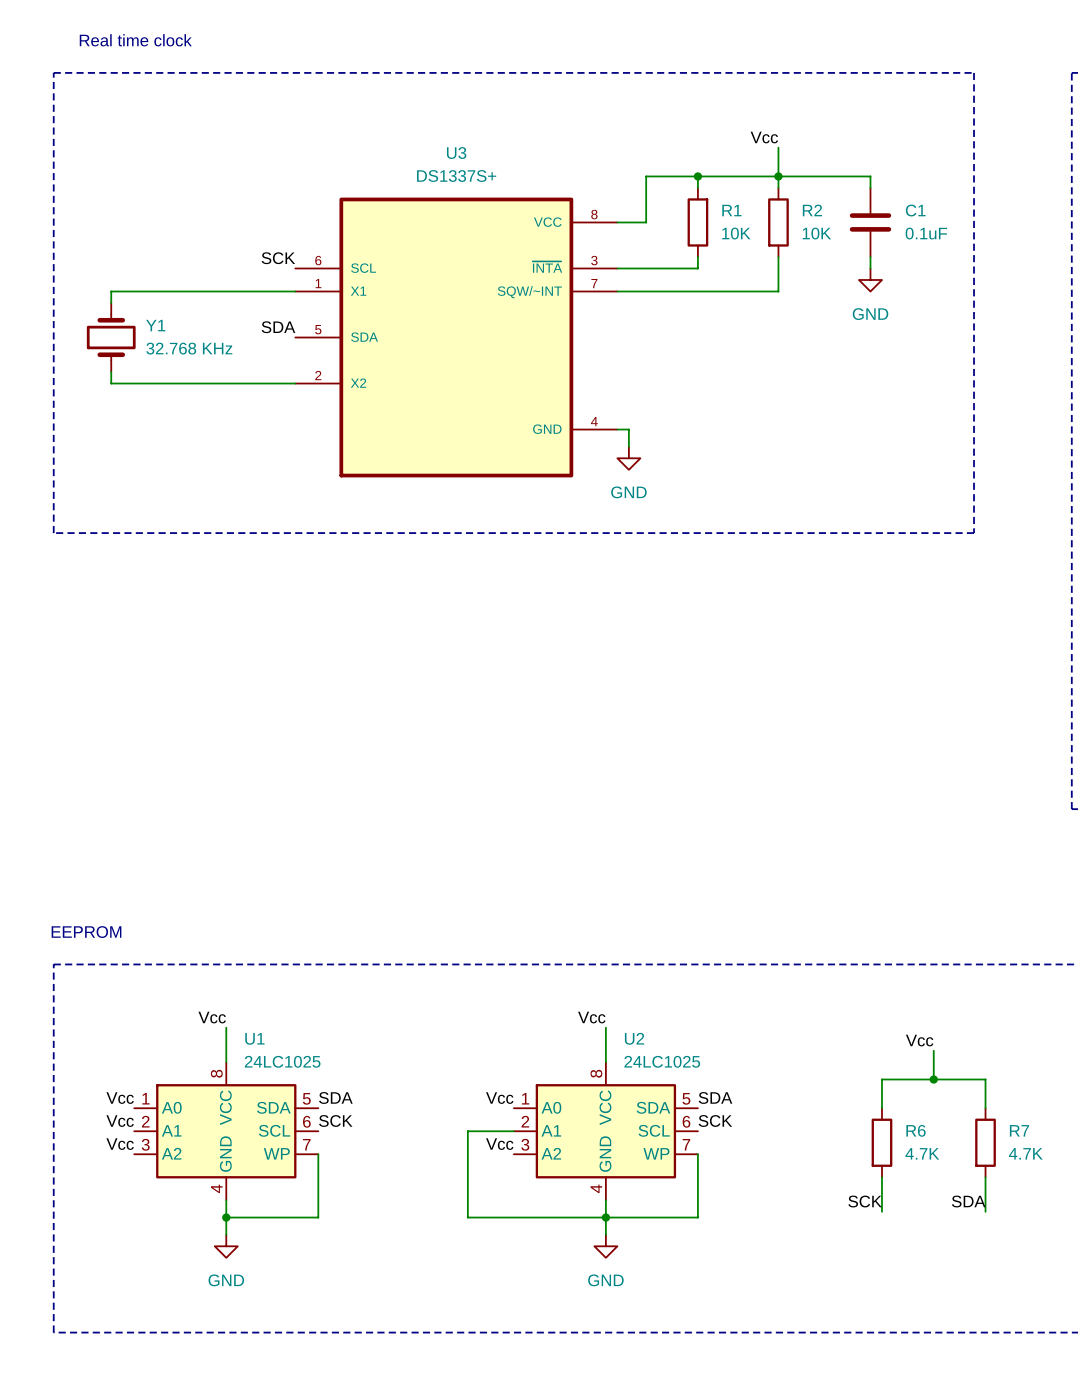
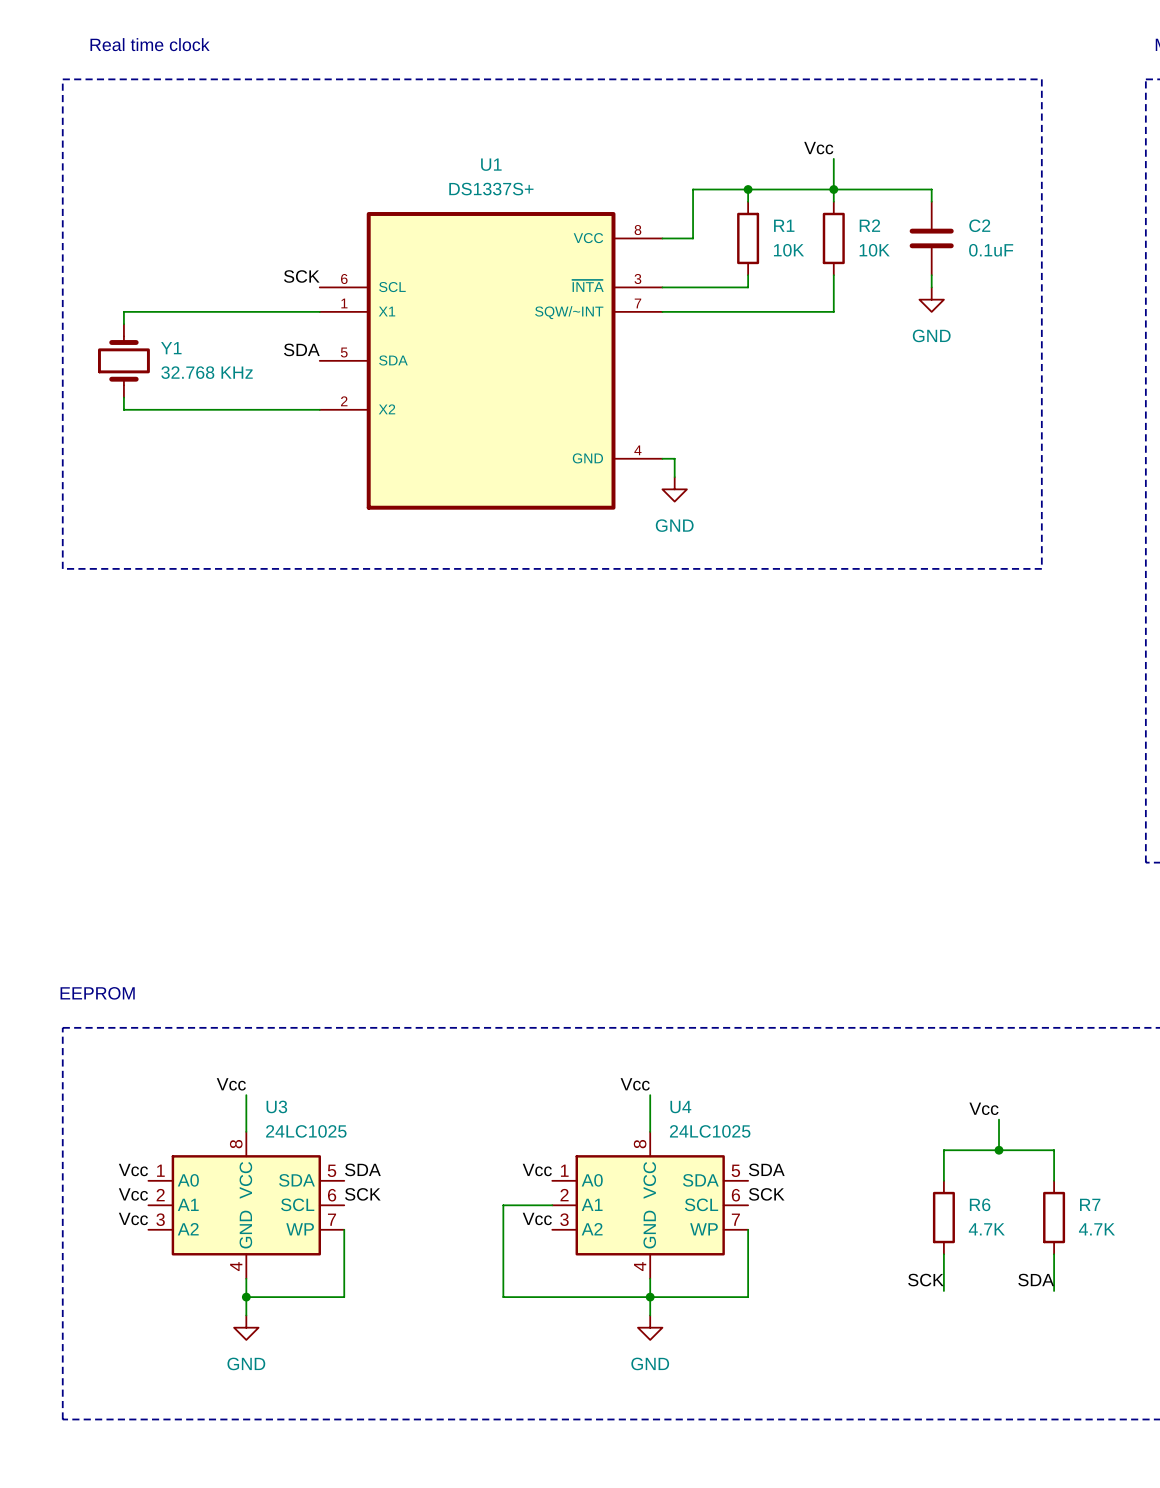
U3 name: U3 (456, 153) -> U1 (491, 164)
C1 name: C1 (915, 210) -> C2 (979, 225)
U1 name: U1 (254, 1038) -> U3 (276, 1106)
U2 name: U2 (634, 1038) -> U4 (680, 1107)

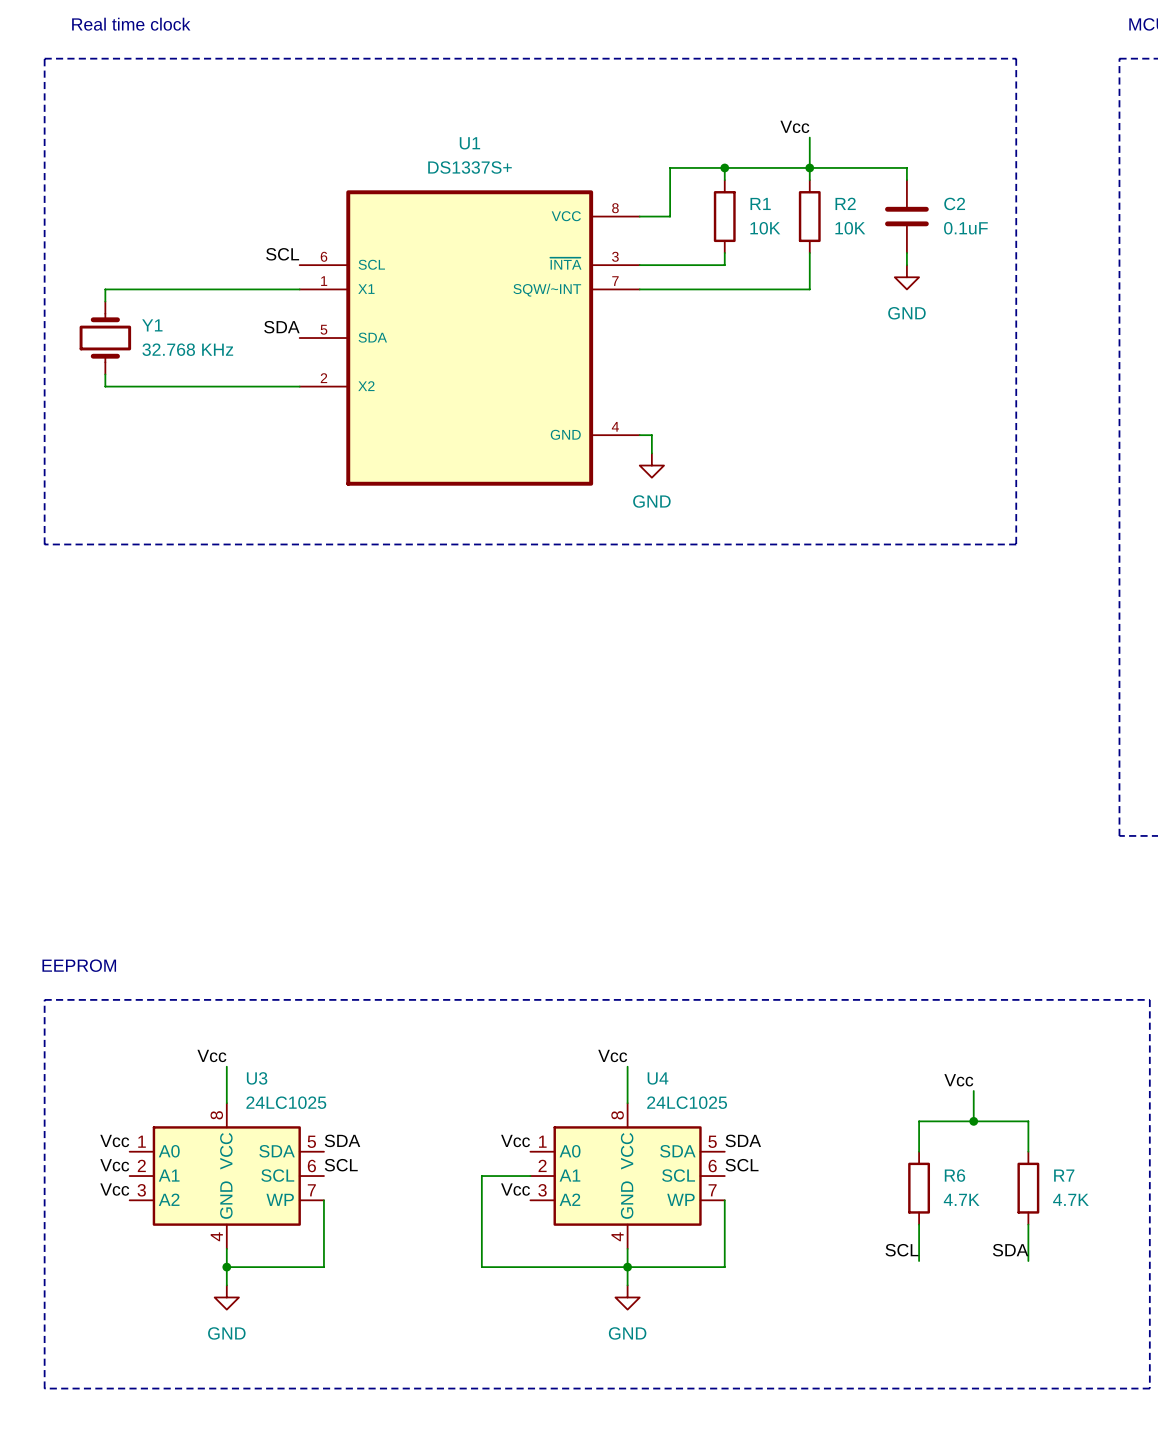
label: SCK (301, 276) -> SCL (282, 254)
label: SCK (362, 1194) -> SCL (341, 1165)
label: SCK (766, 1194) -> SCL (742, 1165)
label: SCK (925, 1280) -> SCL (902, 1250)

